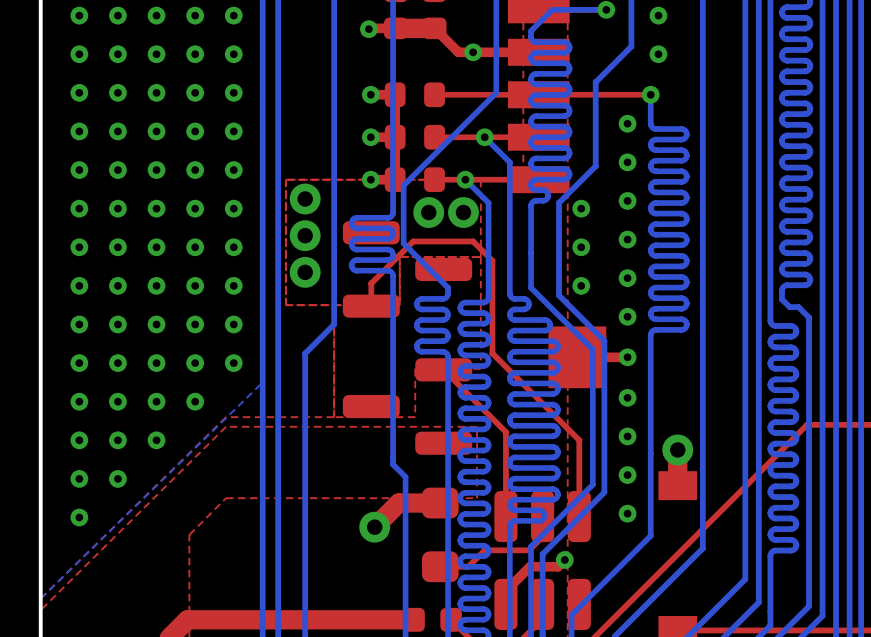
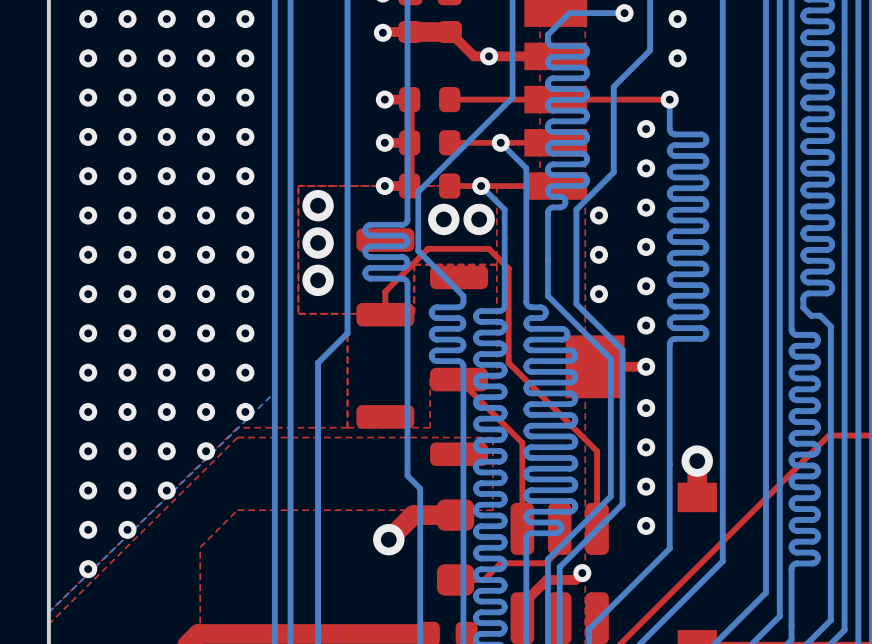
via: none -> (245, 411)
via: none -> (206, 451)
via: none -> (166, 490)
via: none -> (127, 529)
via: none -> (88, 569)

